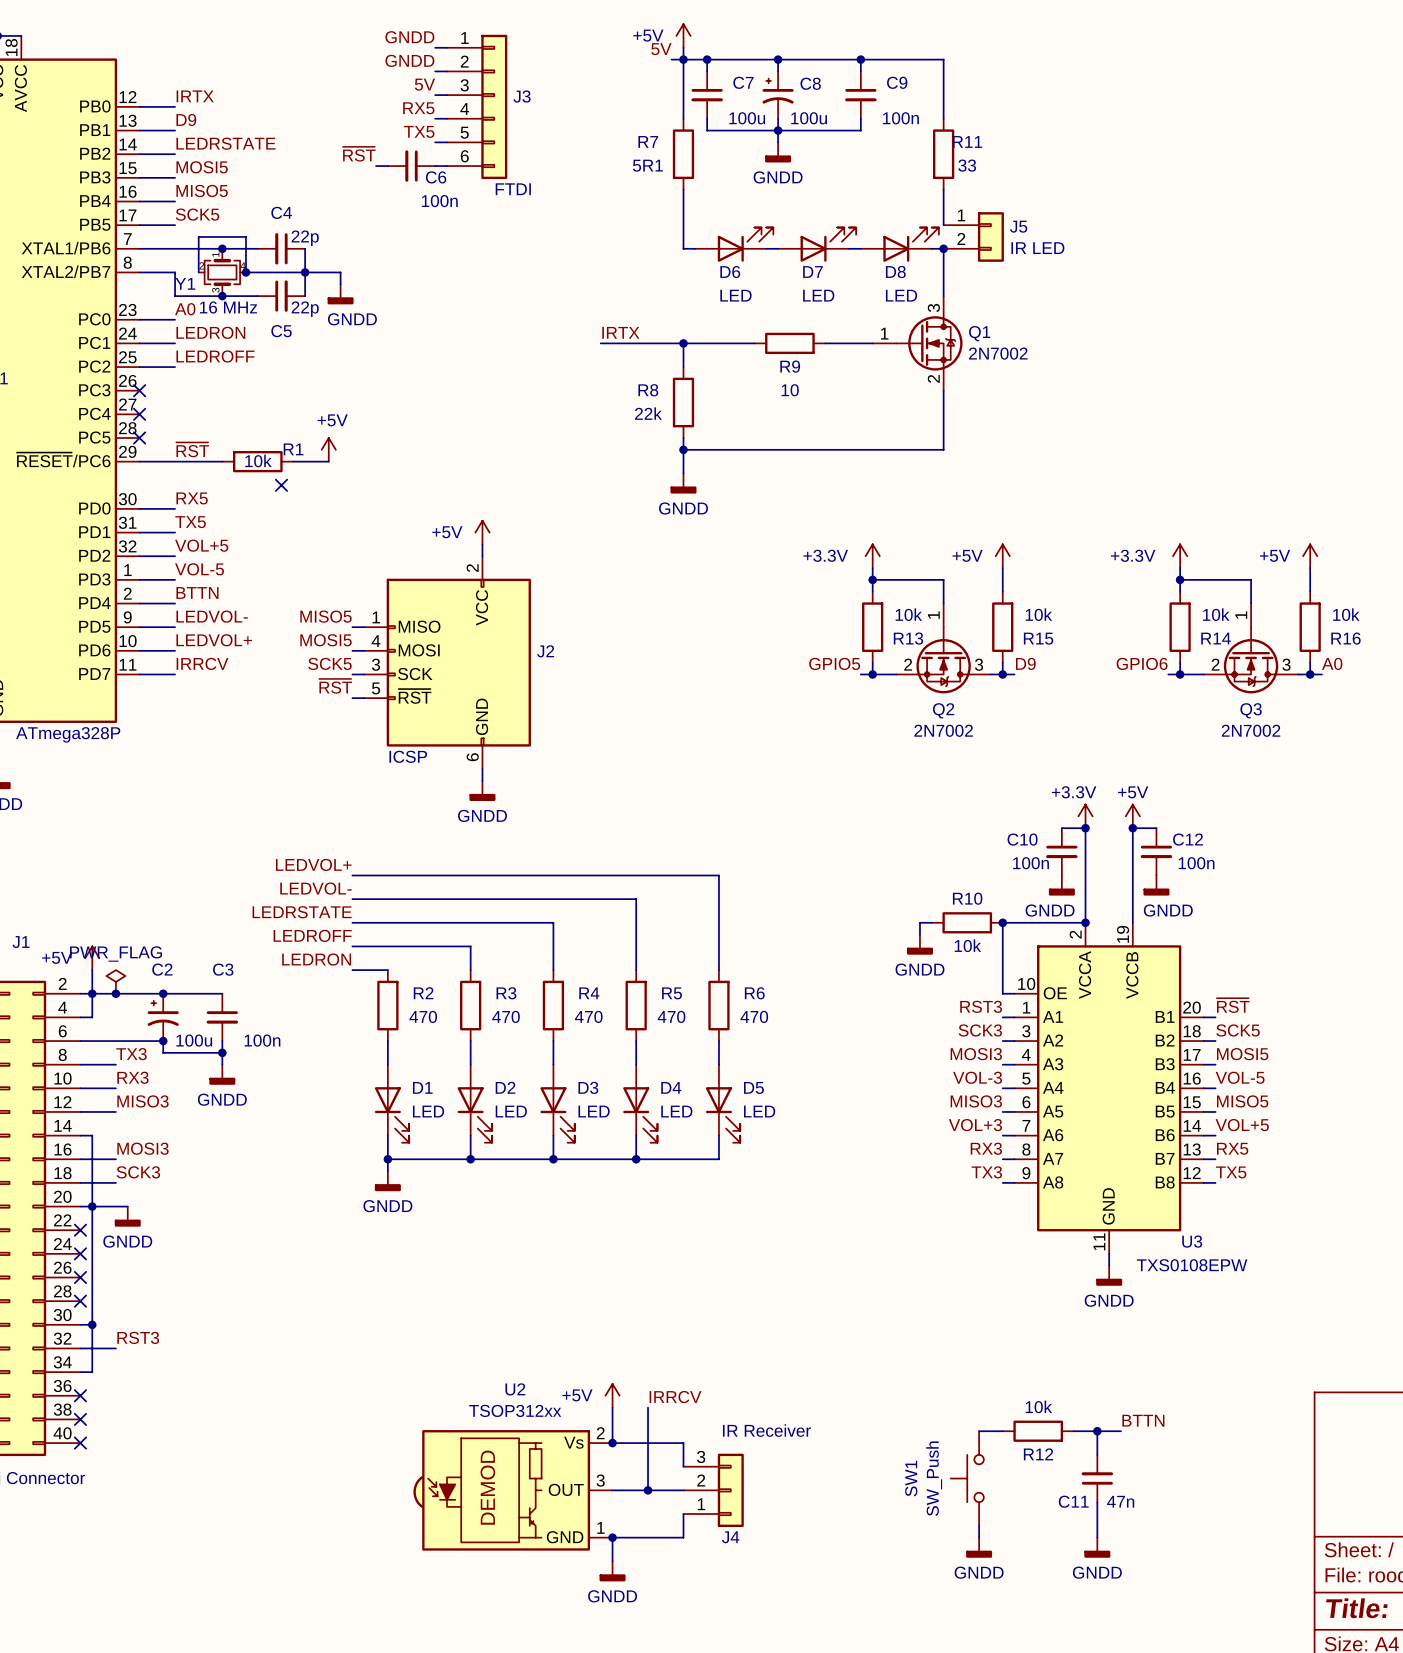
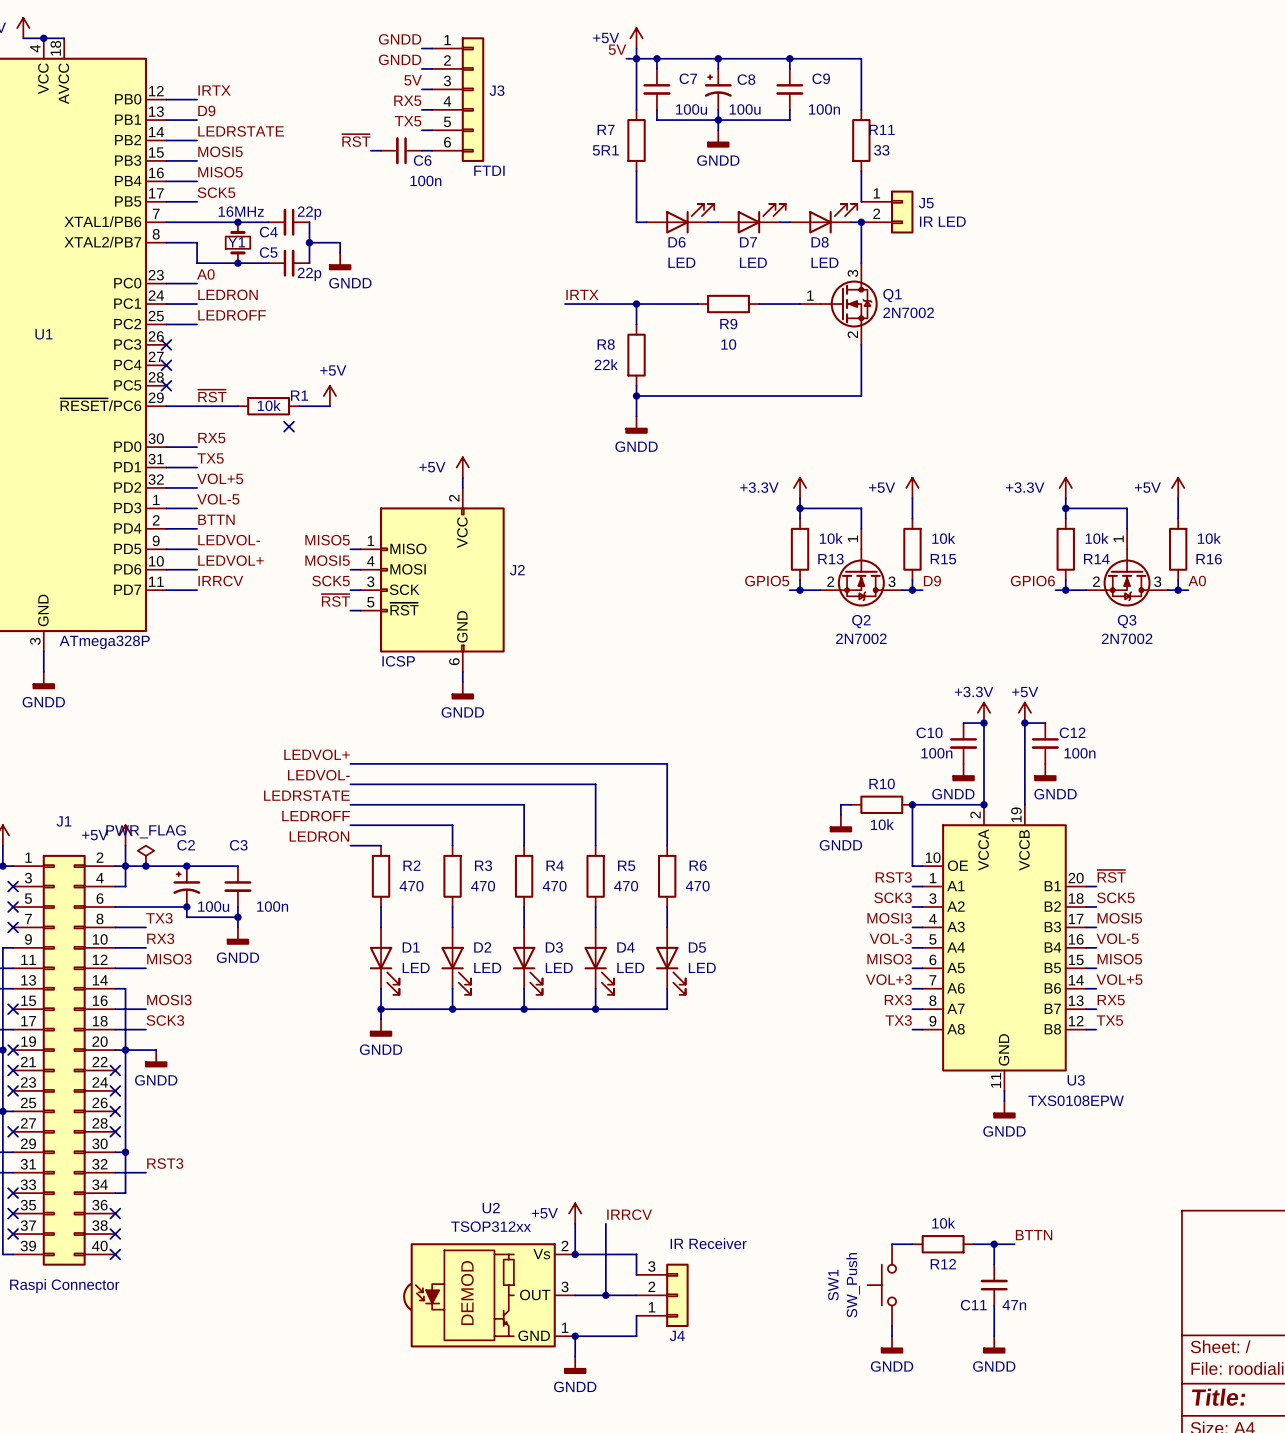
C4 name position: C4 (281, 212) -> C4 (268, 232)
Y1 symbol: [198, 248, 246, 297] -> [225, 222, 251, 264]
wire: (198, 272) (198, 236) (245, 236) (245, 272) (305, 272) -> none
junction: (245, 272) -> none
Y1 name position: Y1 (185, 283) -> Y1 (236, 242)
Y1 value: 16 MHz (228, 307) -> 16MHz (241, 211)
C5 name position: C5 (281, 331) -> C5 (268, 252)

